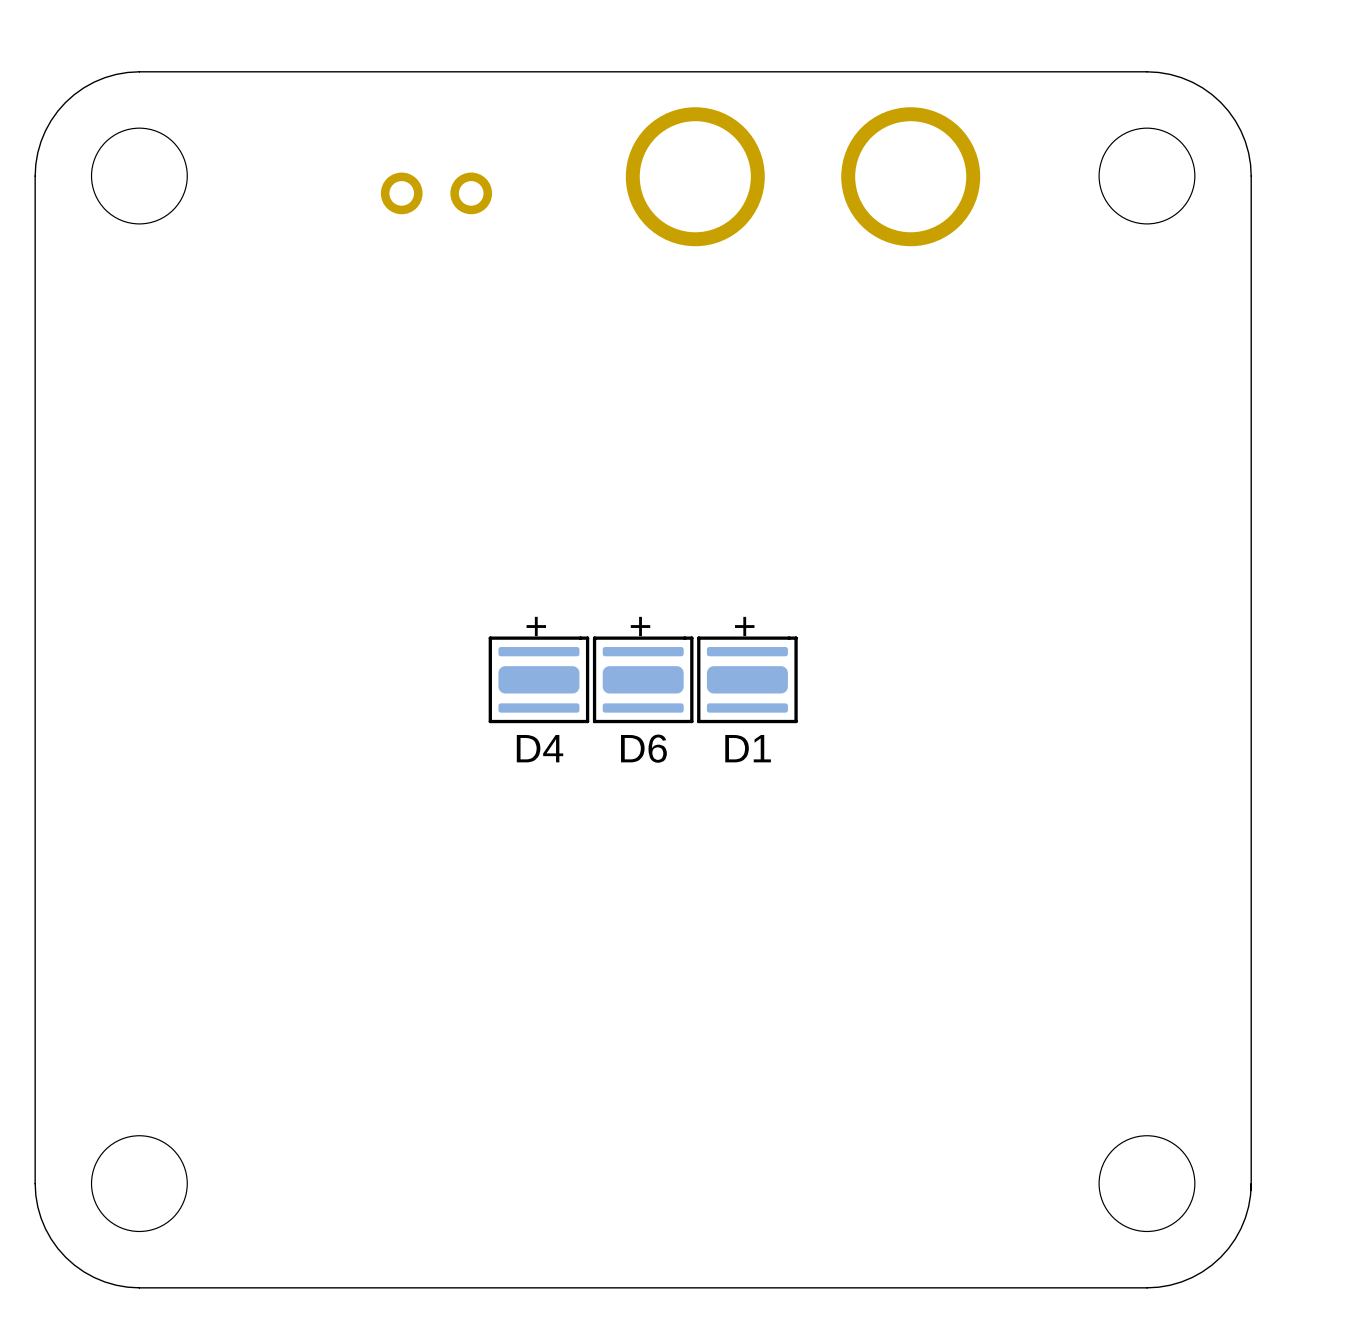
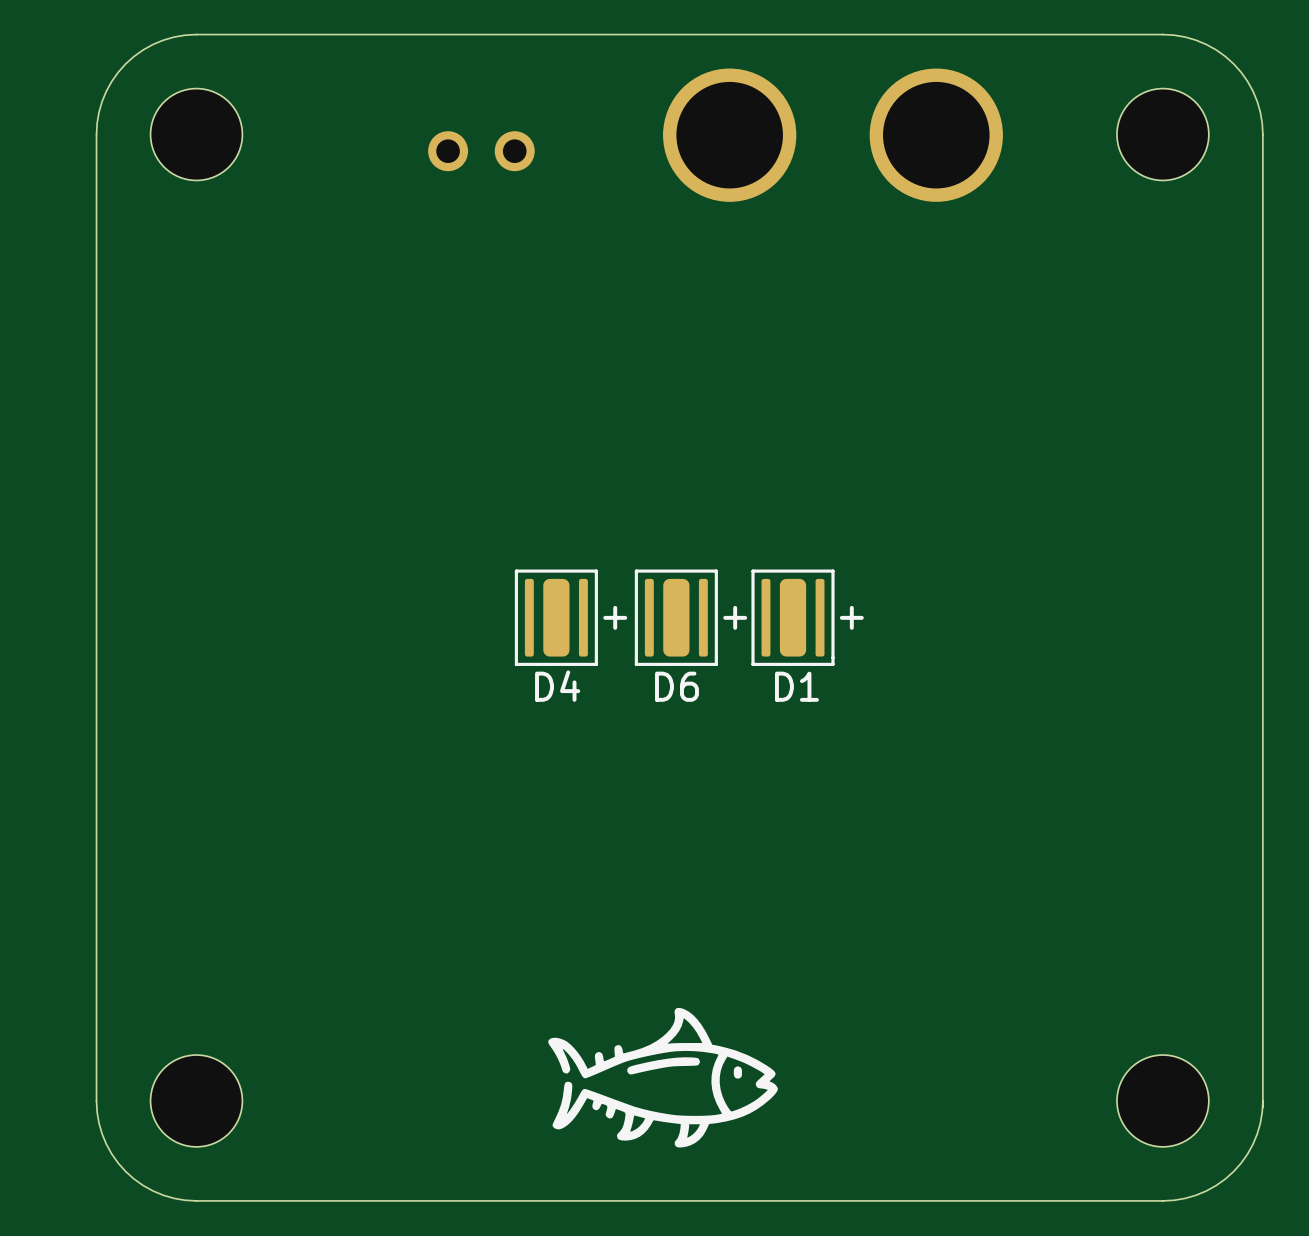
D4 rotation: 0° (538, 679) -> 90° clockwise (556, 617)
D6 rotation: 0° (643, 679) -> 90° clockwise (676, 617)
D1 rotation: 0° (747, 679) -> 90° clockwise (793, 617)
drawing: none -> [548, 1007, 778, 1148]

